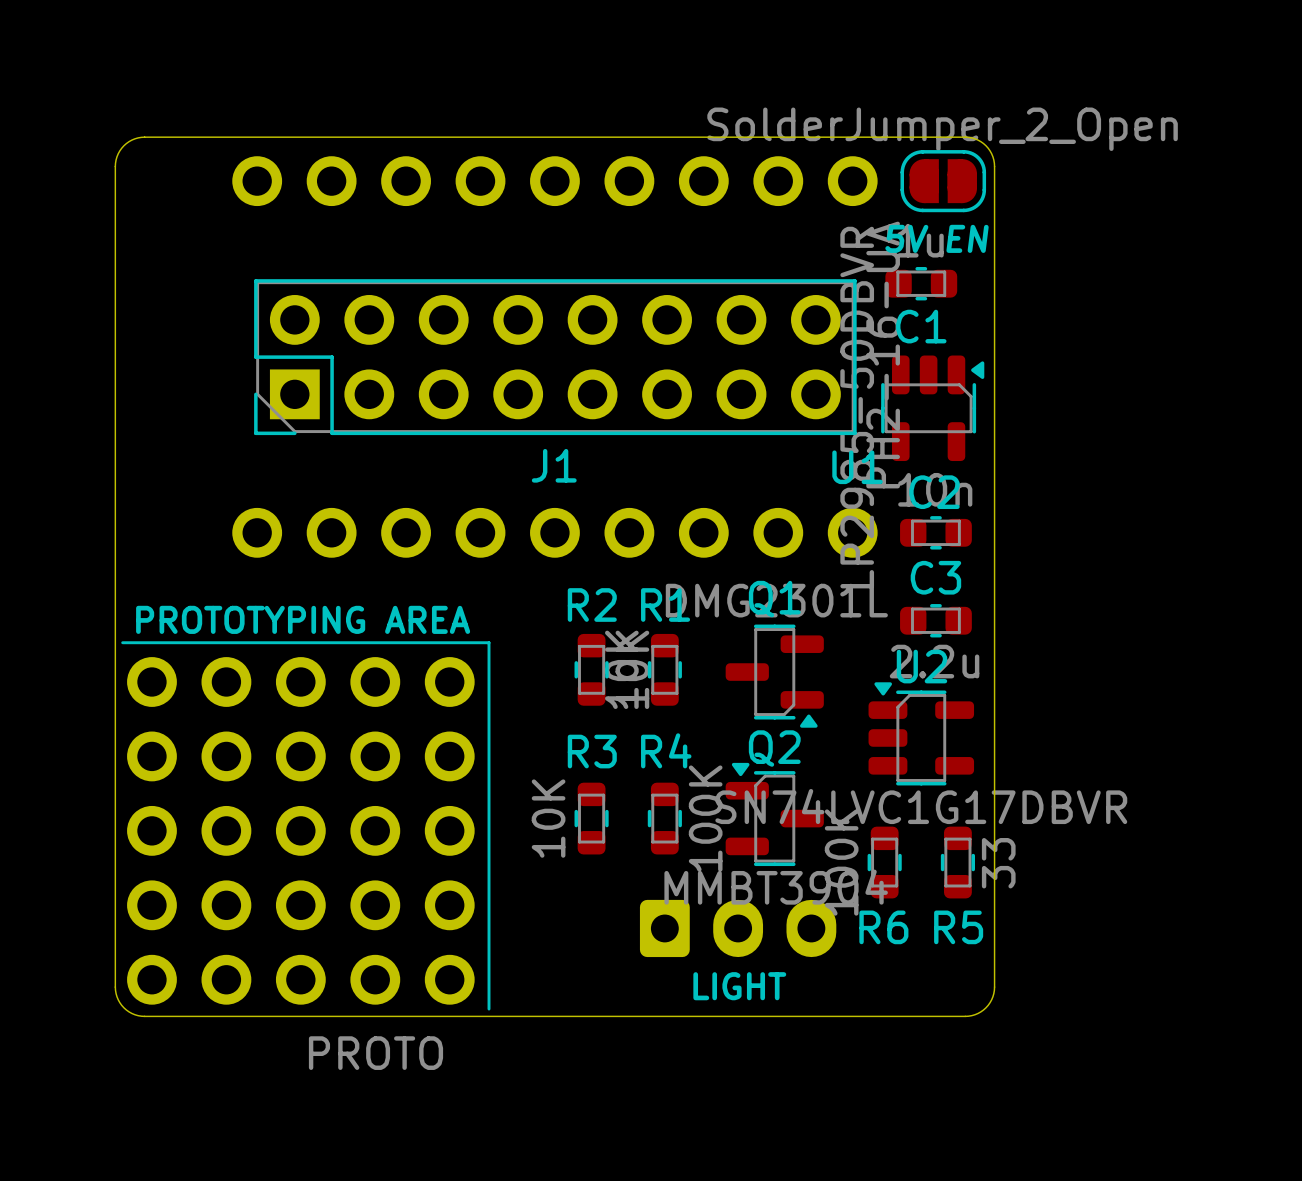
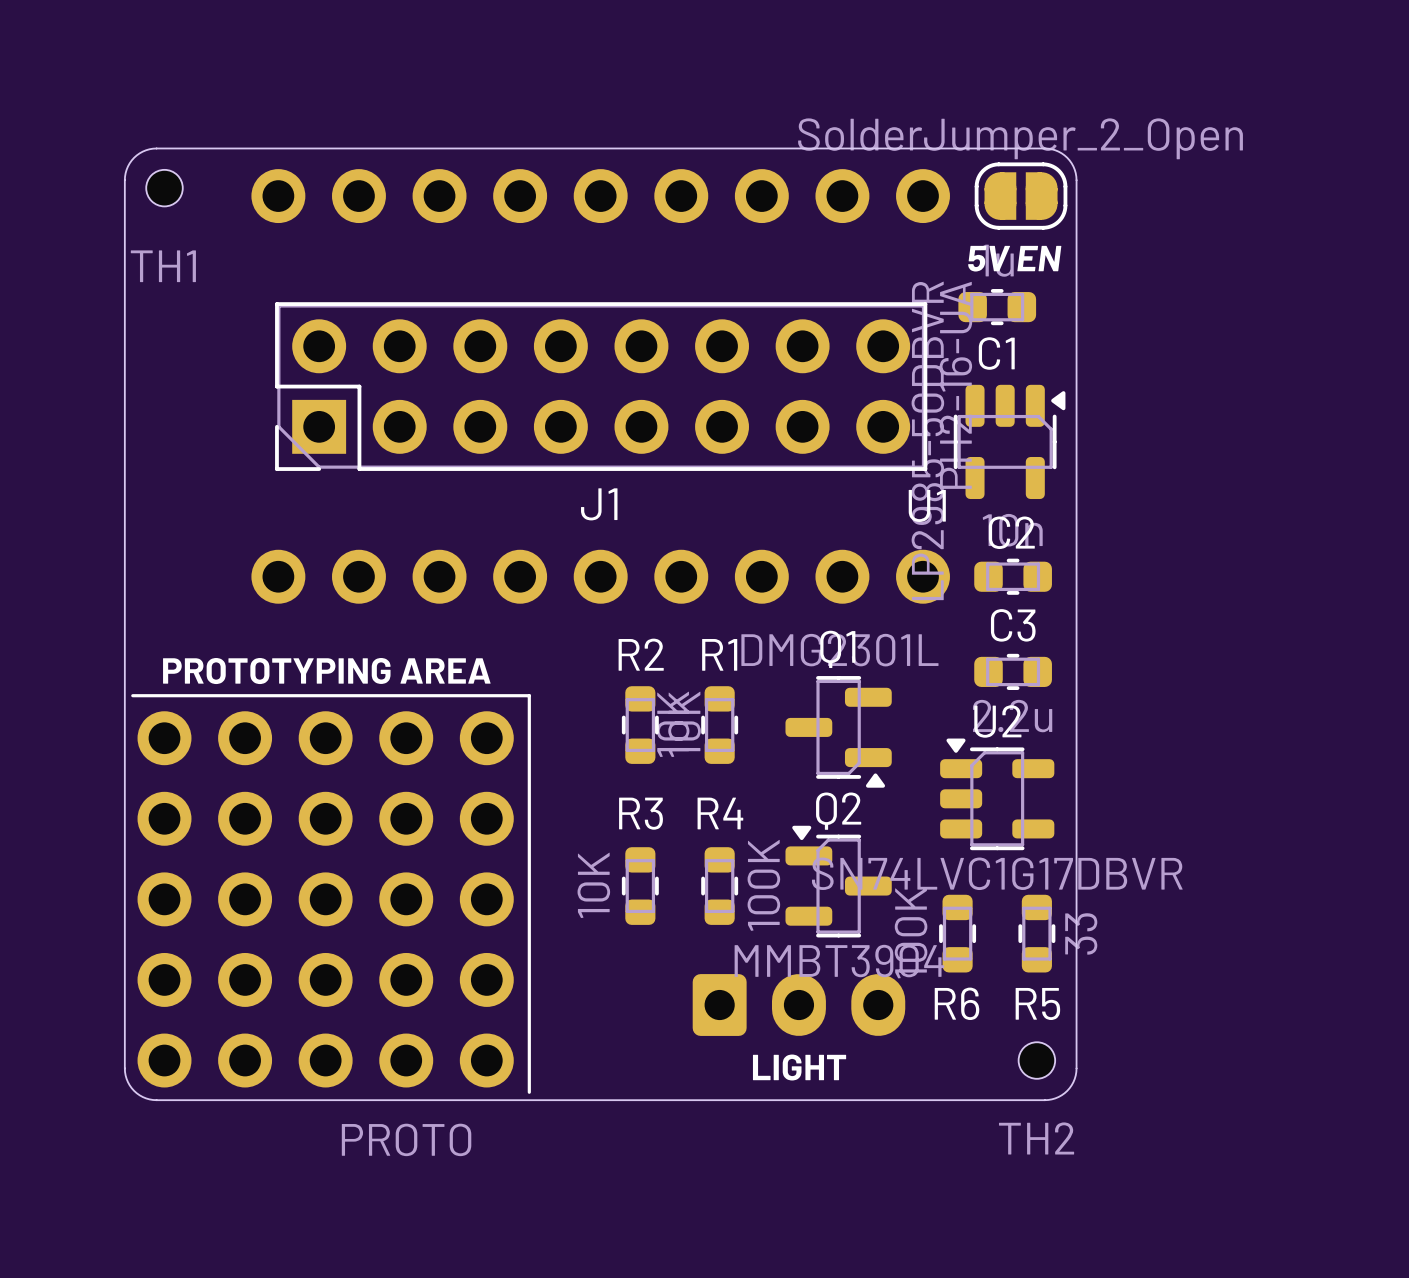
TH1: none -> (164, 188)
TH2: none -> (1036, 1060)

